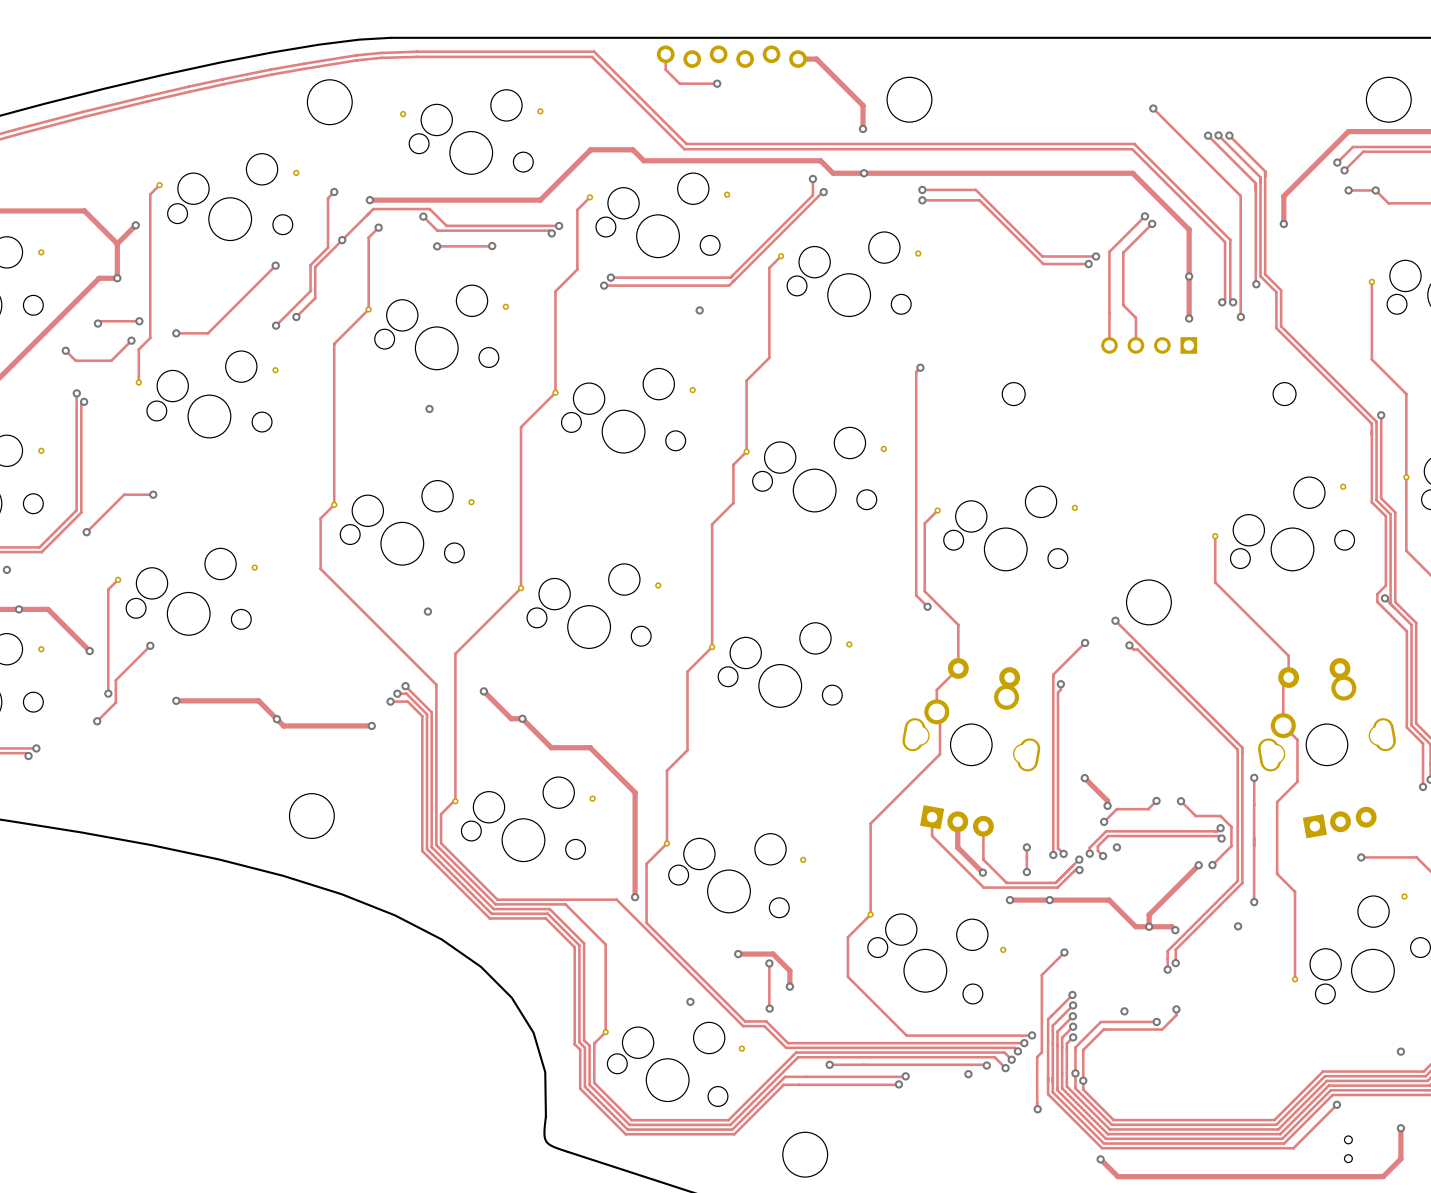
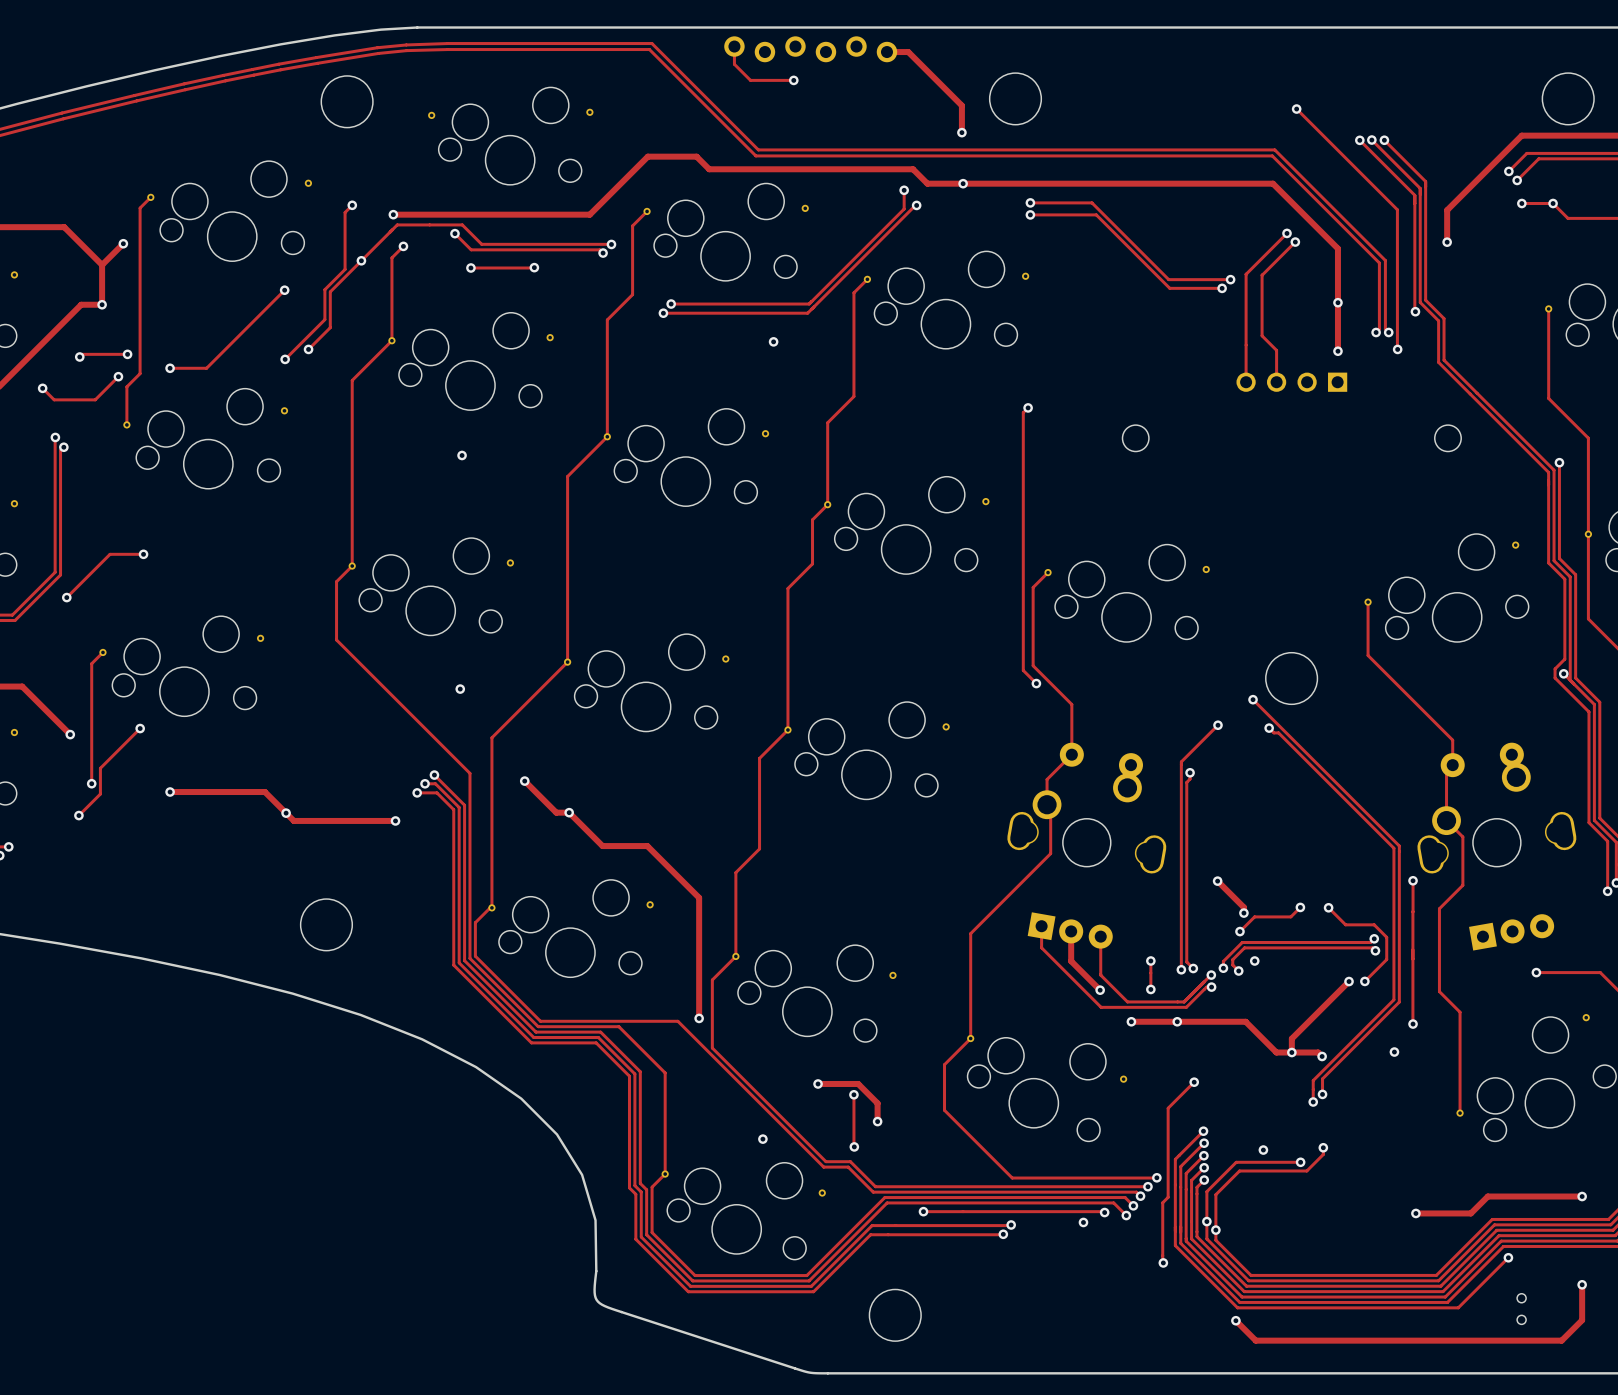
track: none -> (1582, 1196) (1487, 1196) (1470, 1213) (1415, 1213)
via: none -> (1415, 1213)

